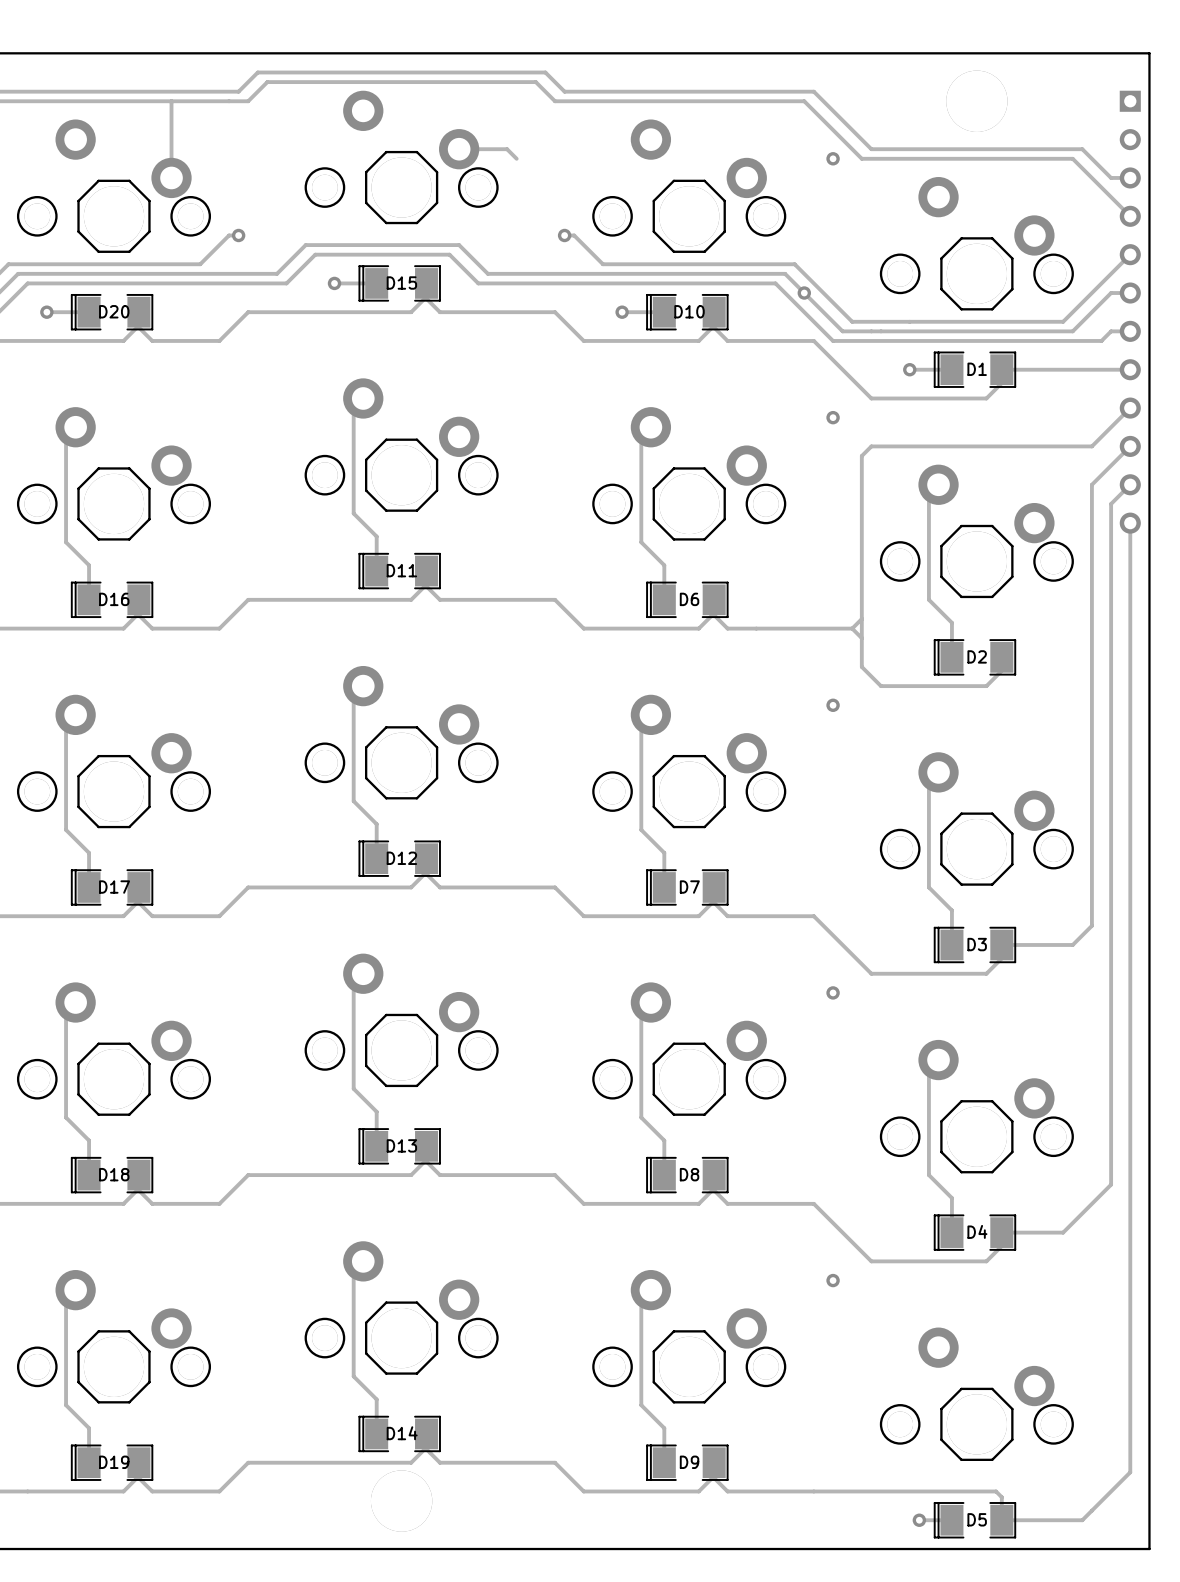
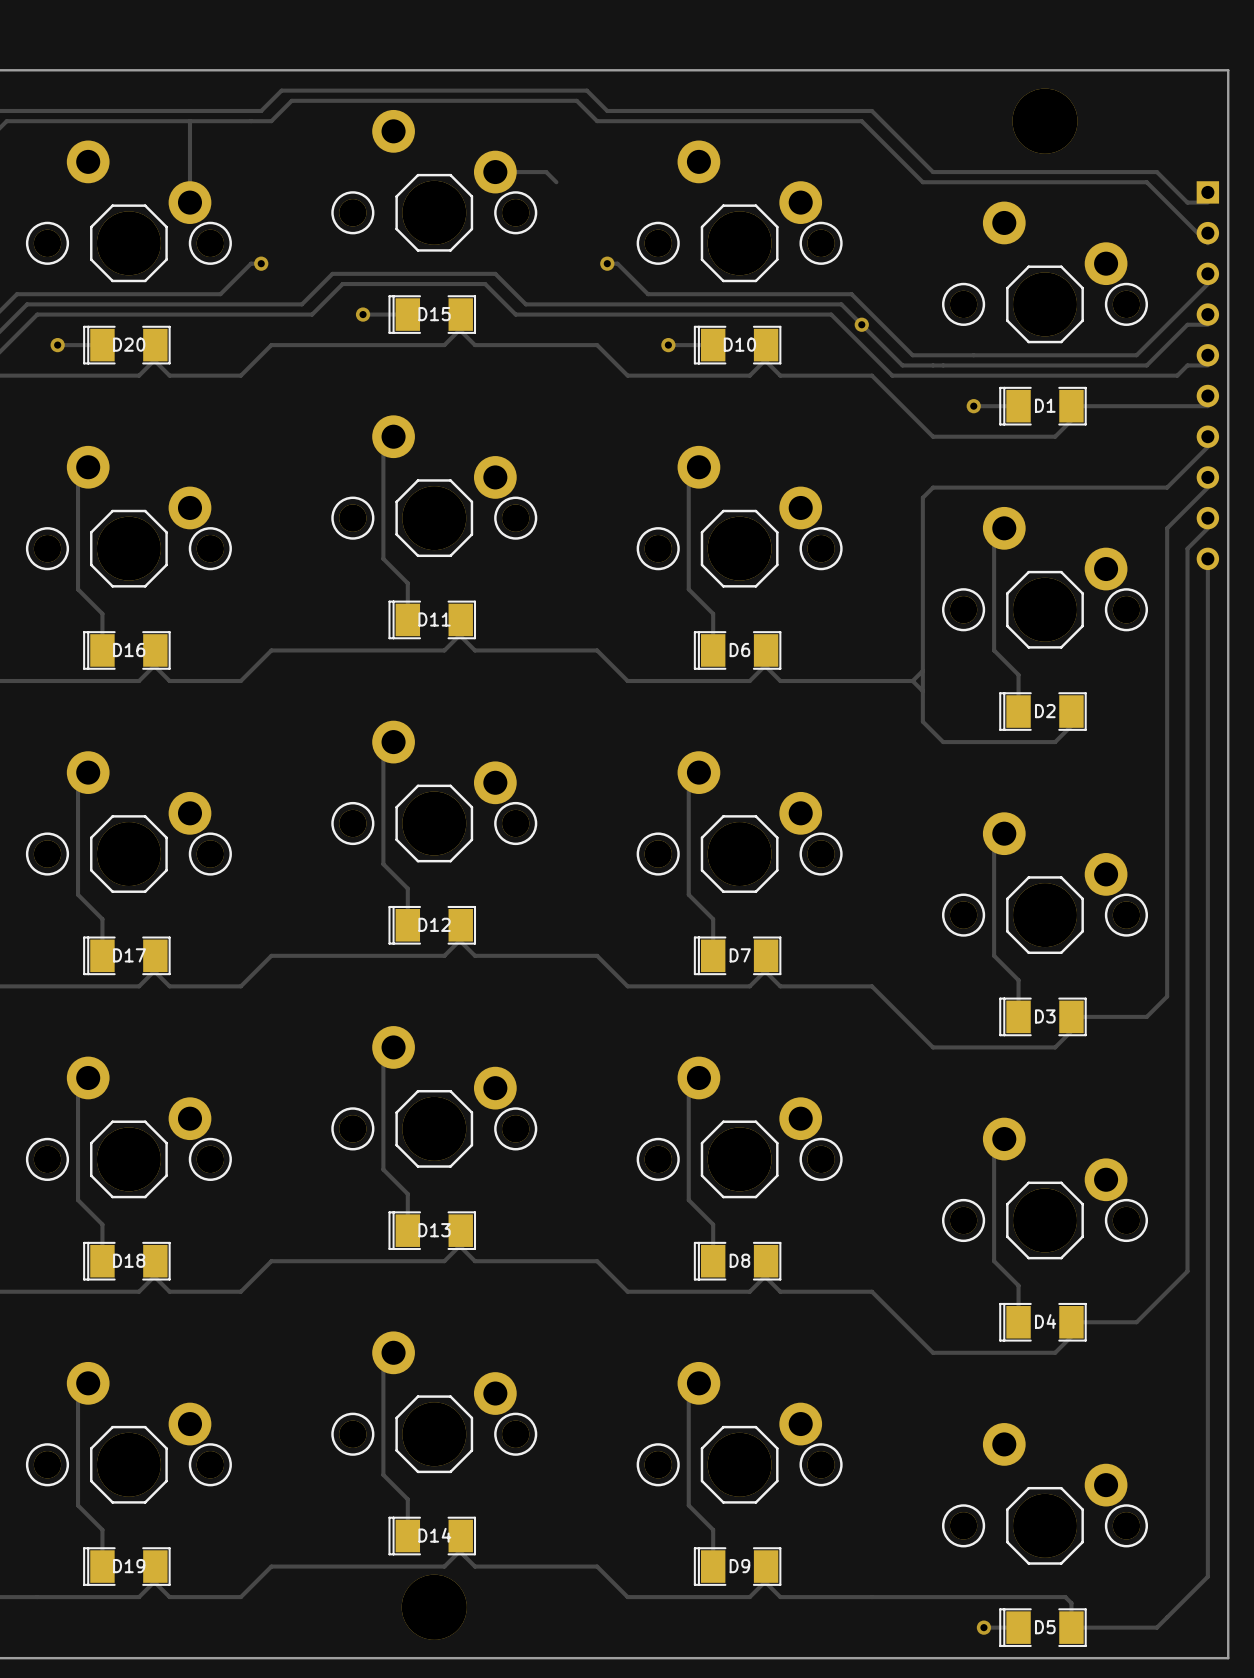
via: (833, 158) -> none
part: (1130, 312) -> none
part: none -> (1207, 375)
via: (833, 417) -> none
via: (833, 705) -> none
via: (833, 992) -> none
via: (833, 1280) -> none

